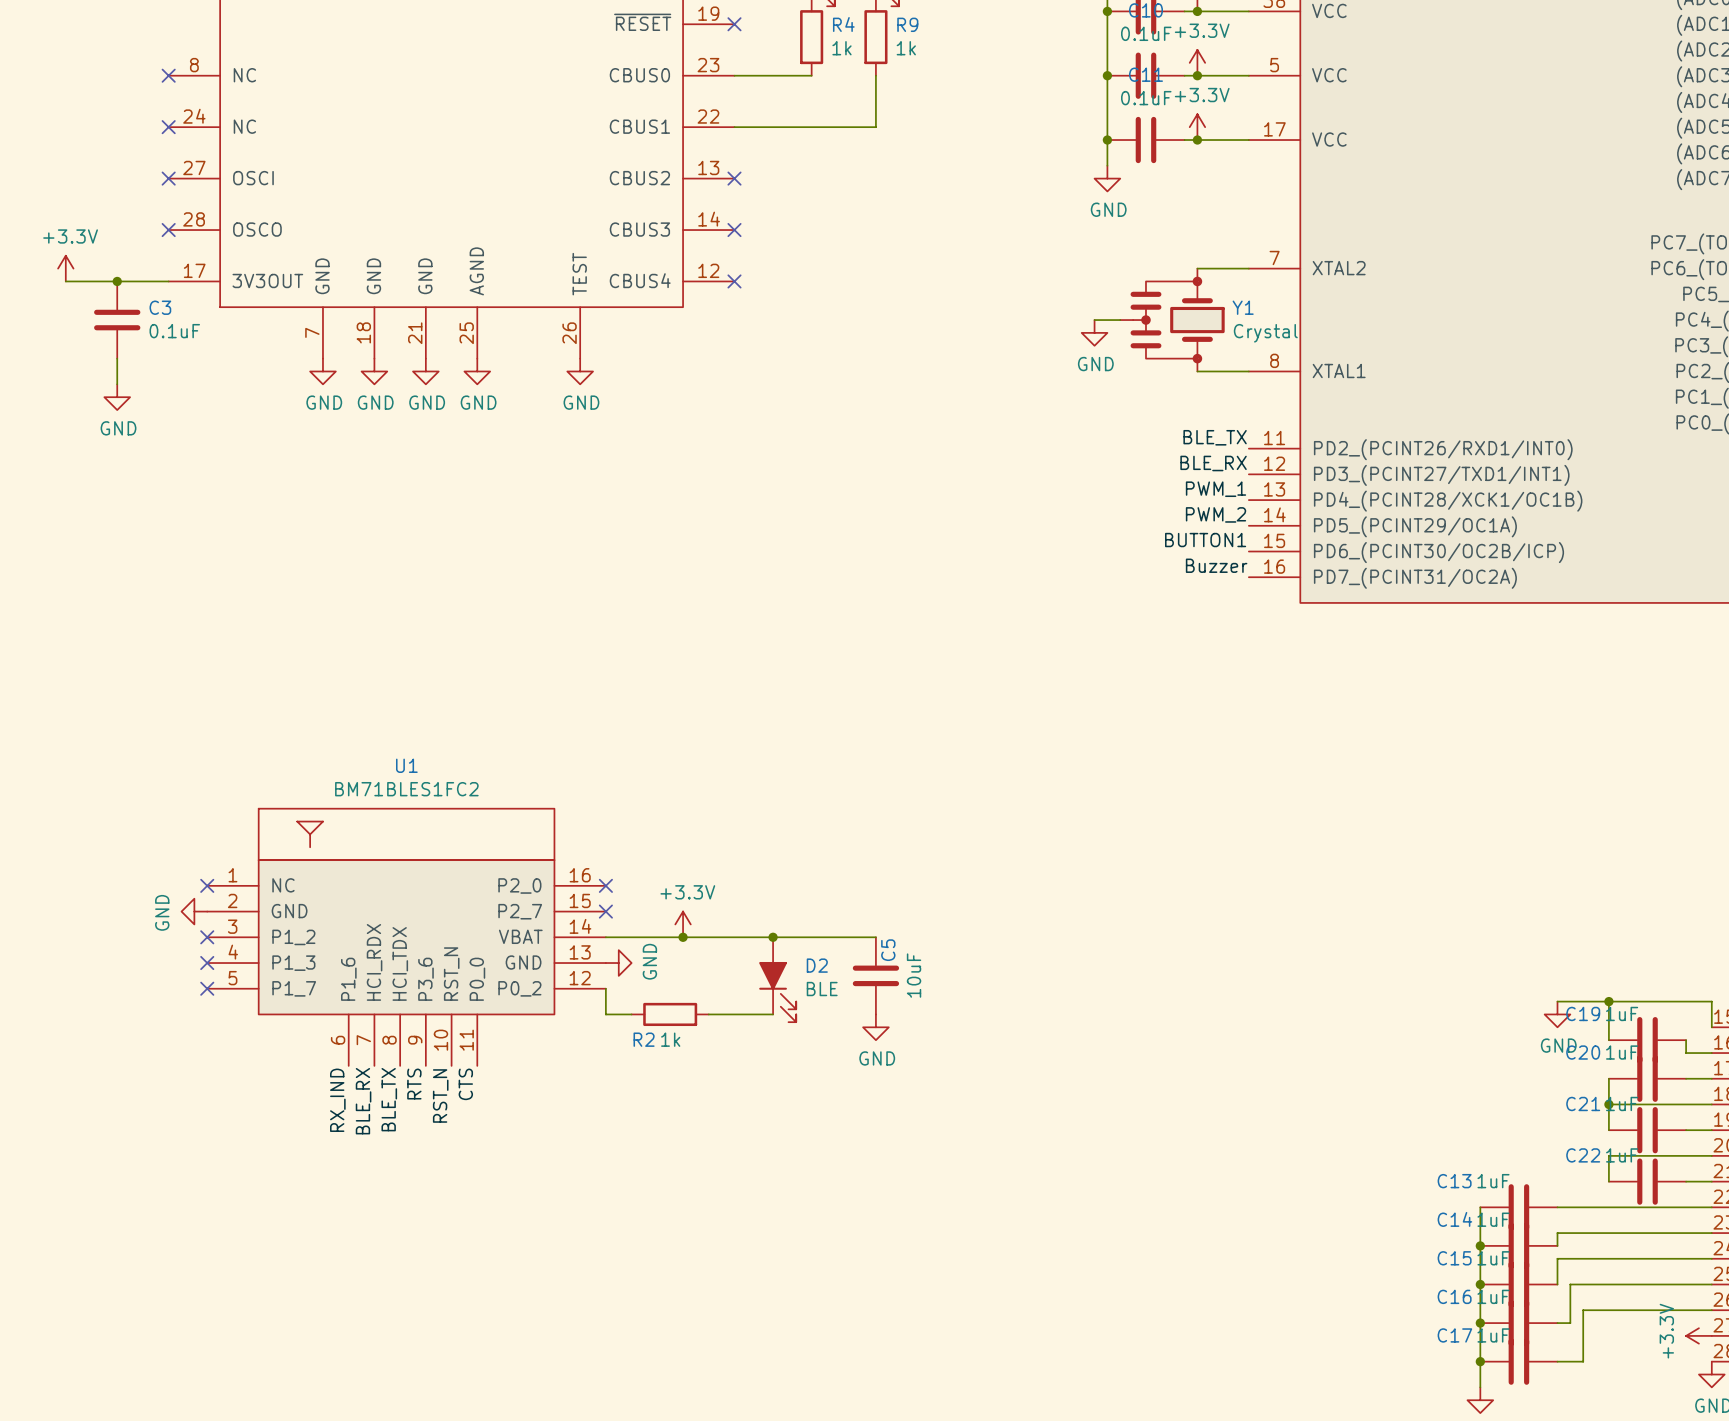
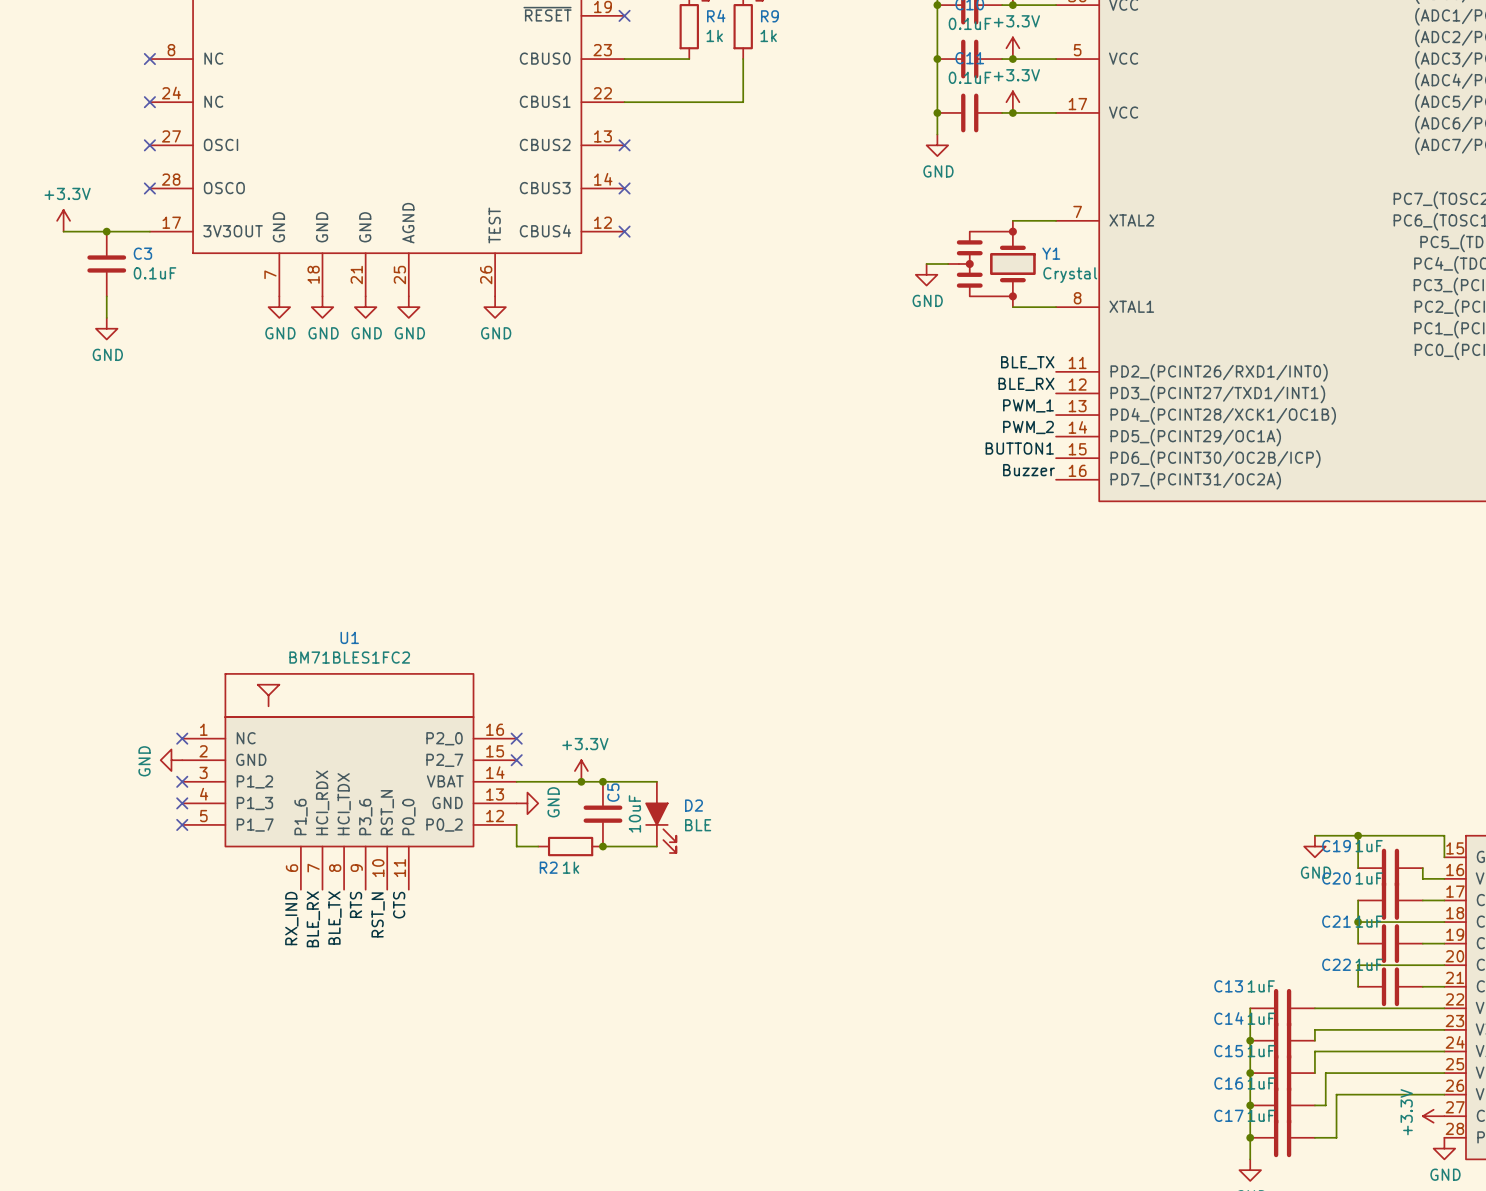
junction: none -> (602, 781)
wire: (773, 937) (875, 937) -> none
junction: (773, 937) -> none
C5 position: (875, 975) -> (602, 814)
junction: none -> (602, 846)
power symbol: GND (875, 1027) -> none

